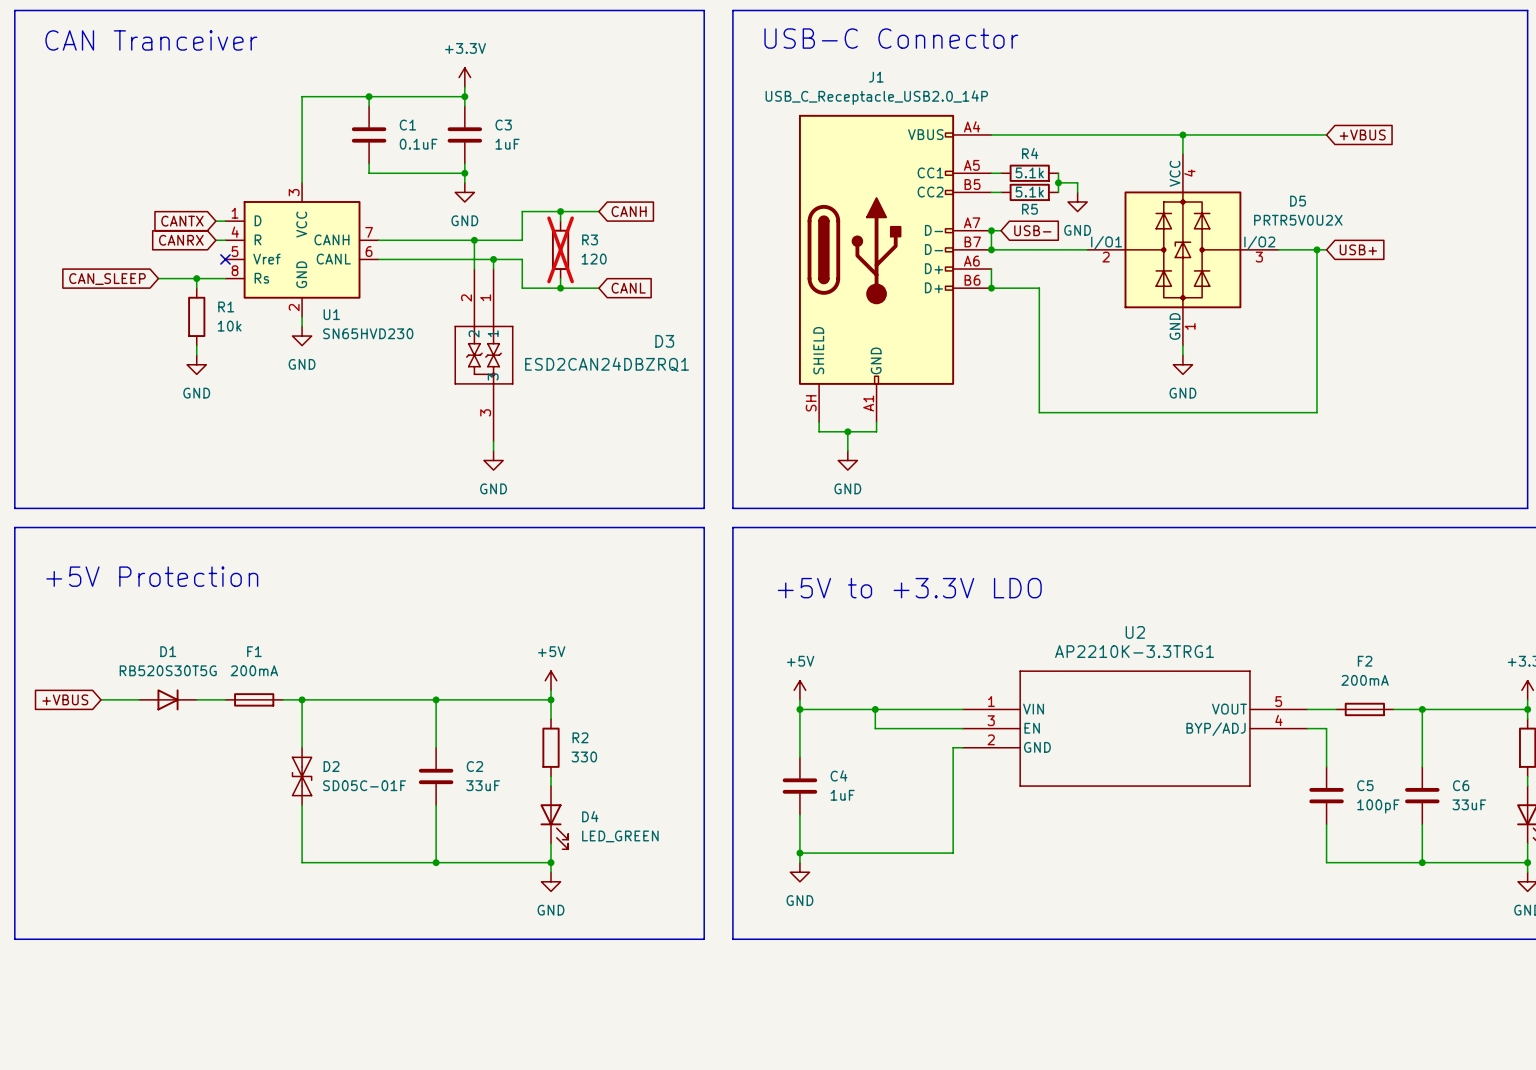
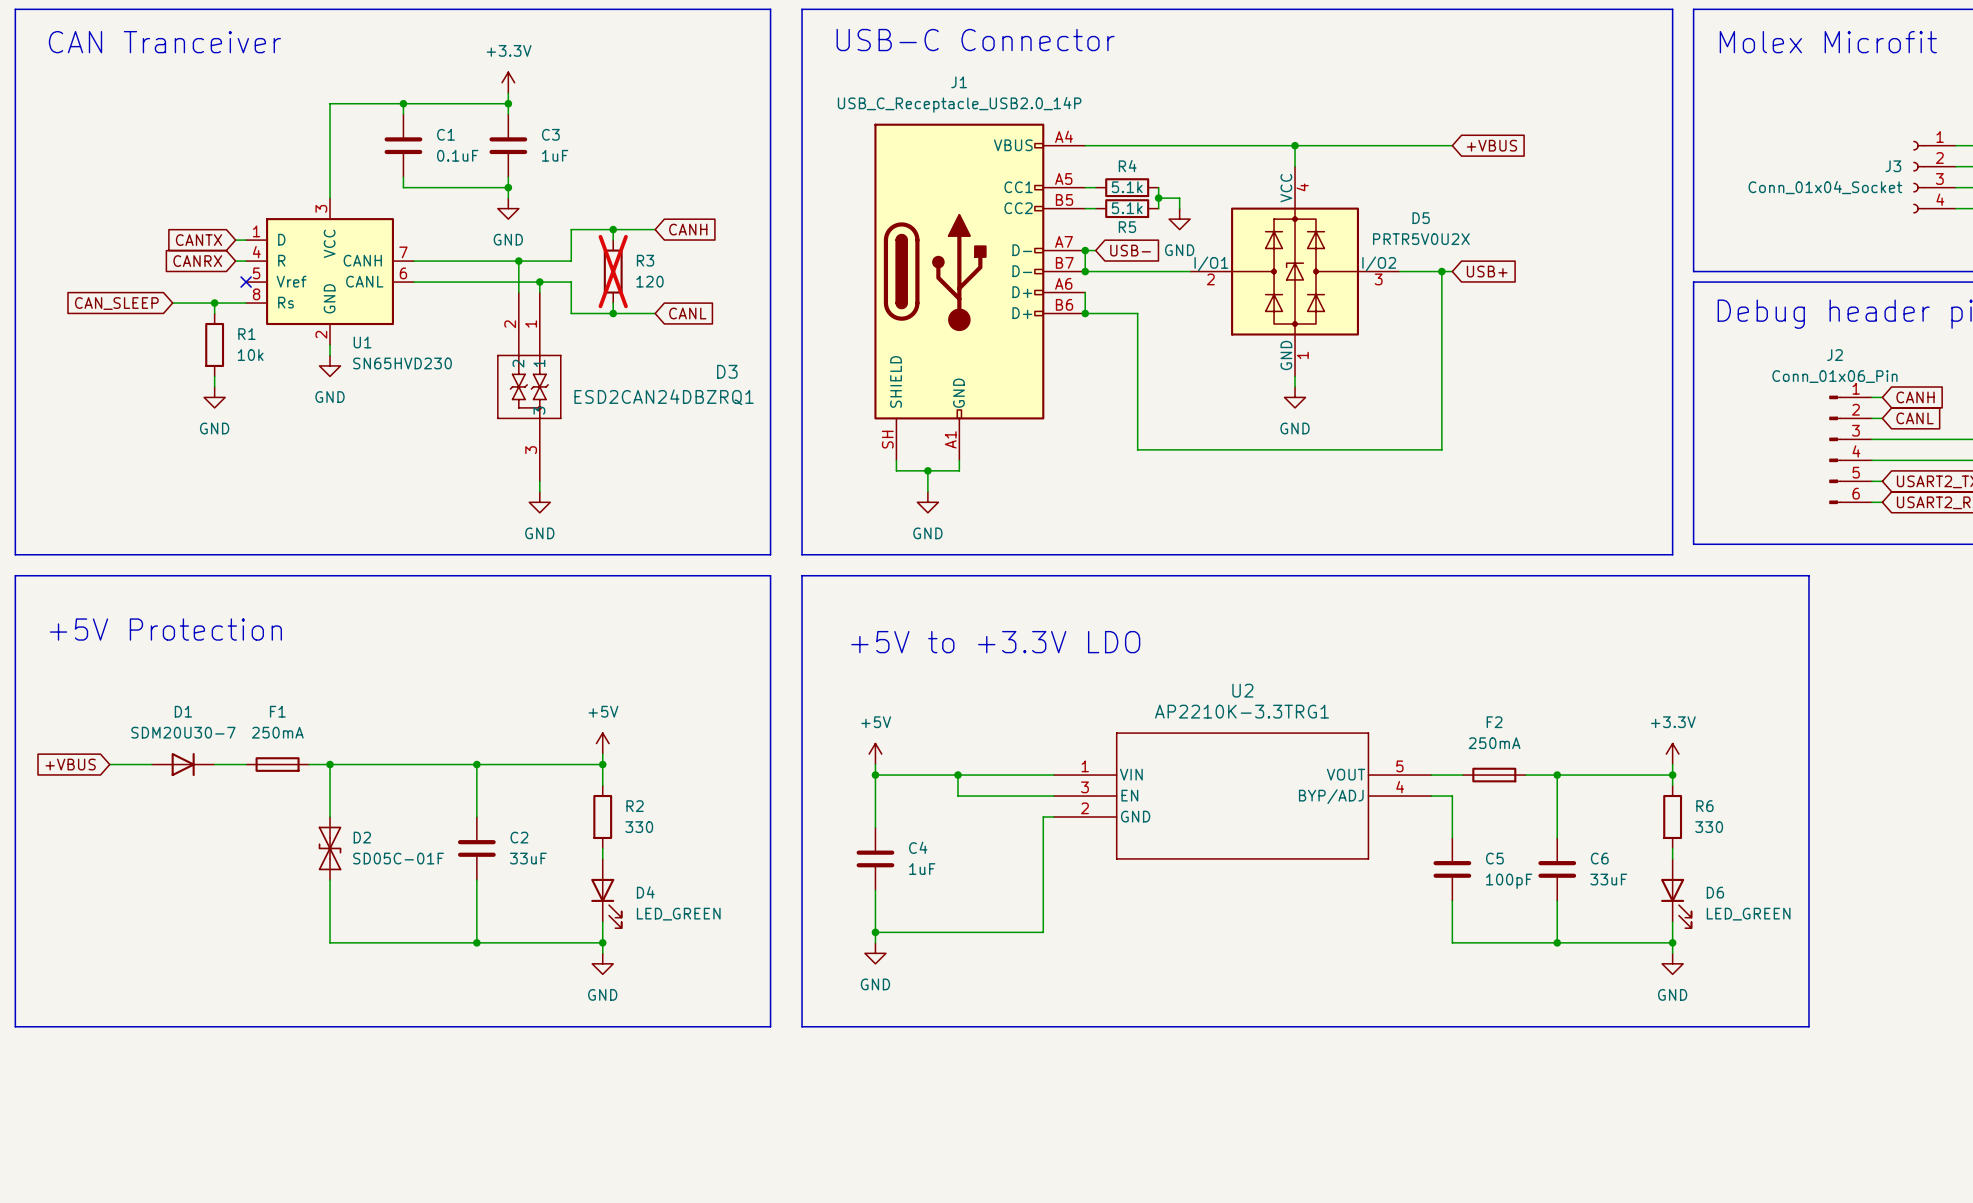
D1 value: RB520S30T5G (168, 670) -> SDM20U30-7 (183, 732)
F1 value: 200mA (254, 670) -> 250mA (277, 732)
F2 value: 200mA (1365, 680) -> 250mA (1494, 743)

